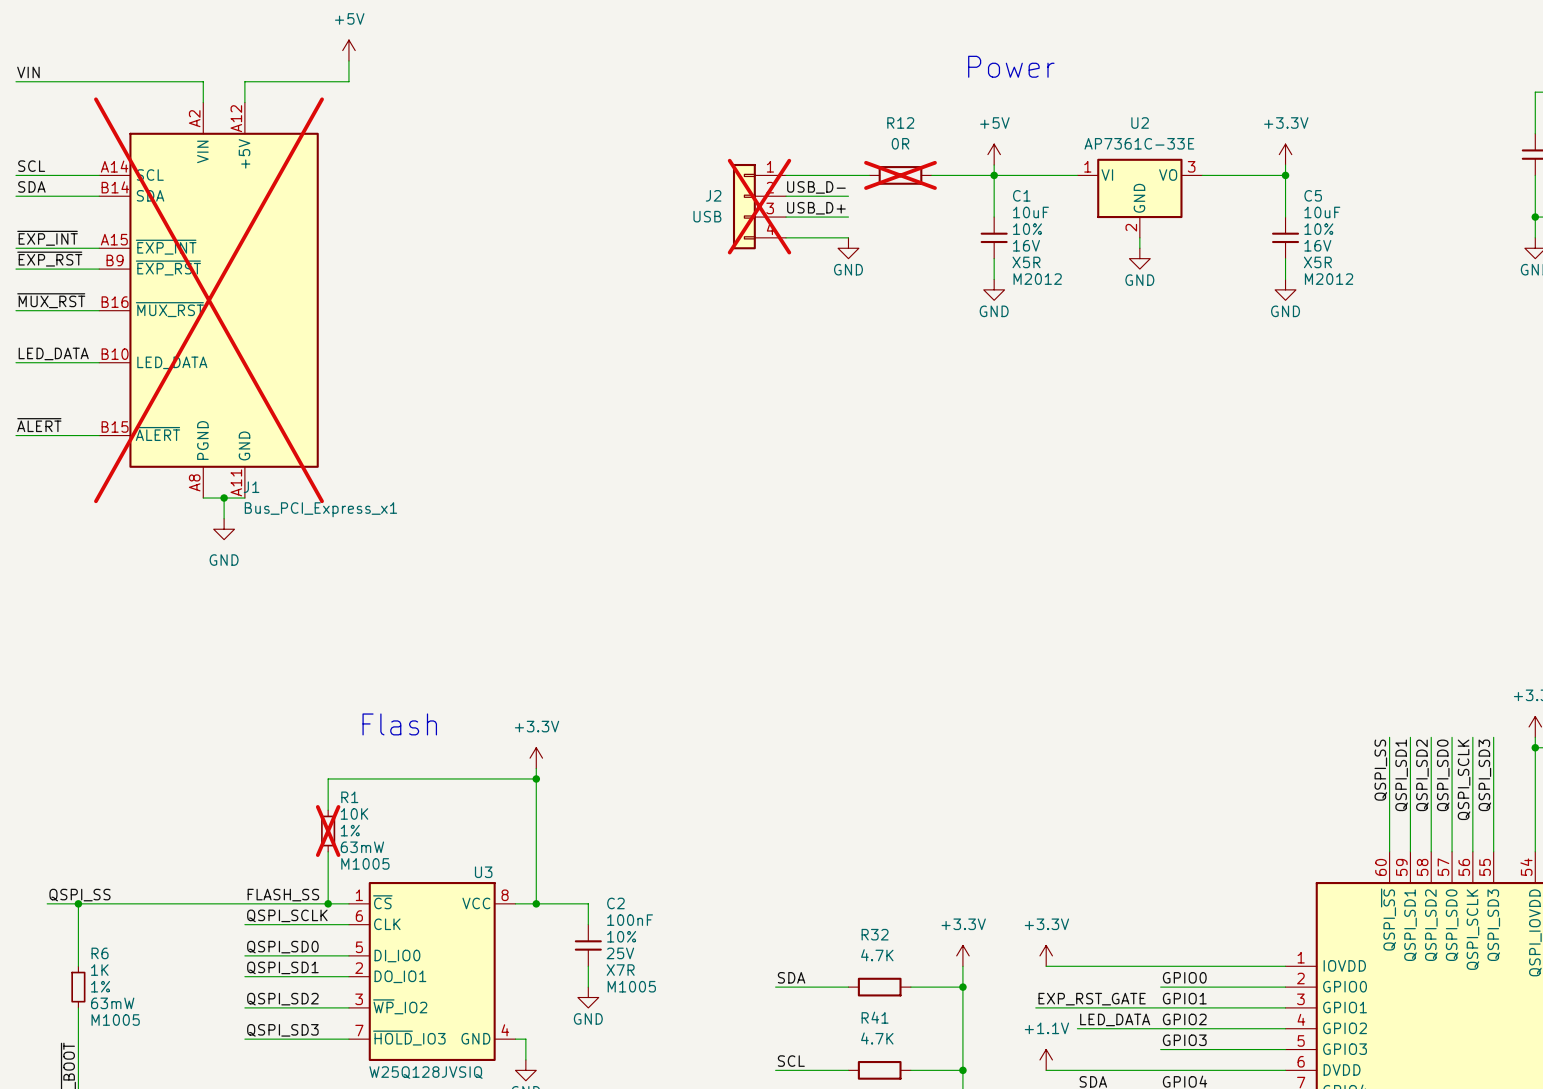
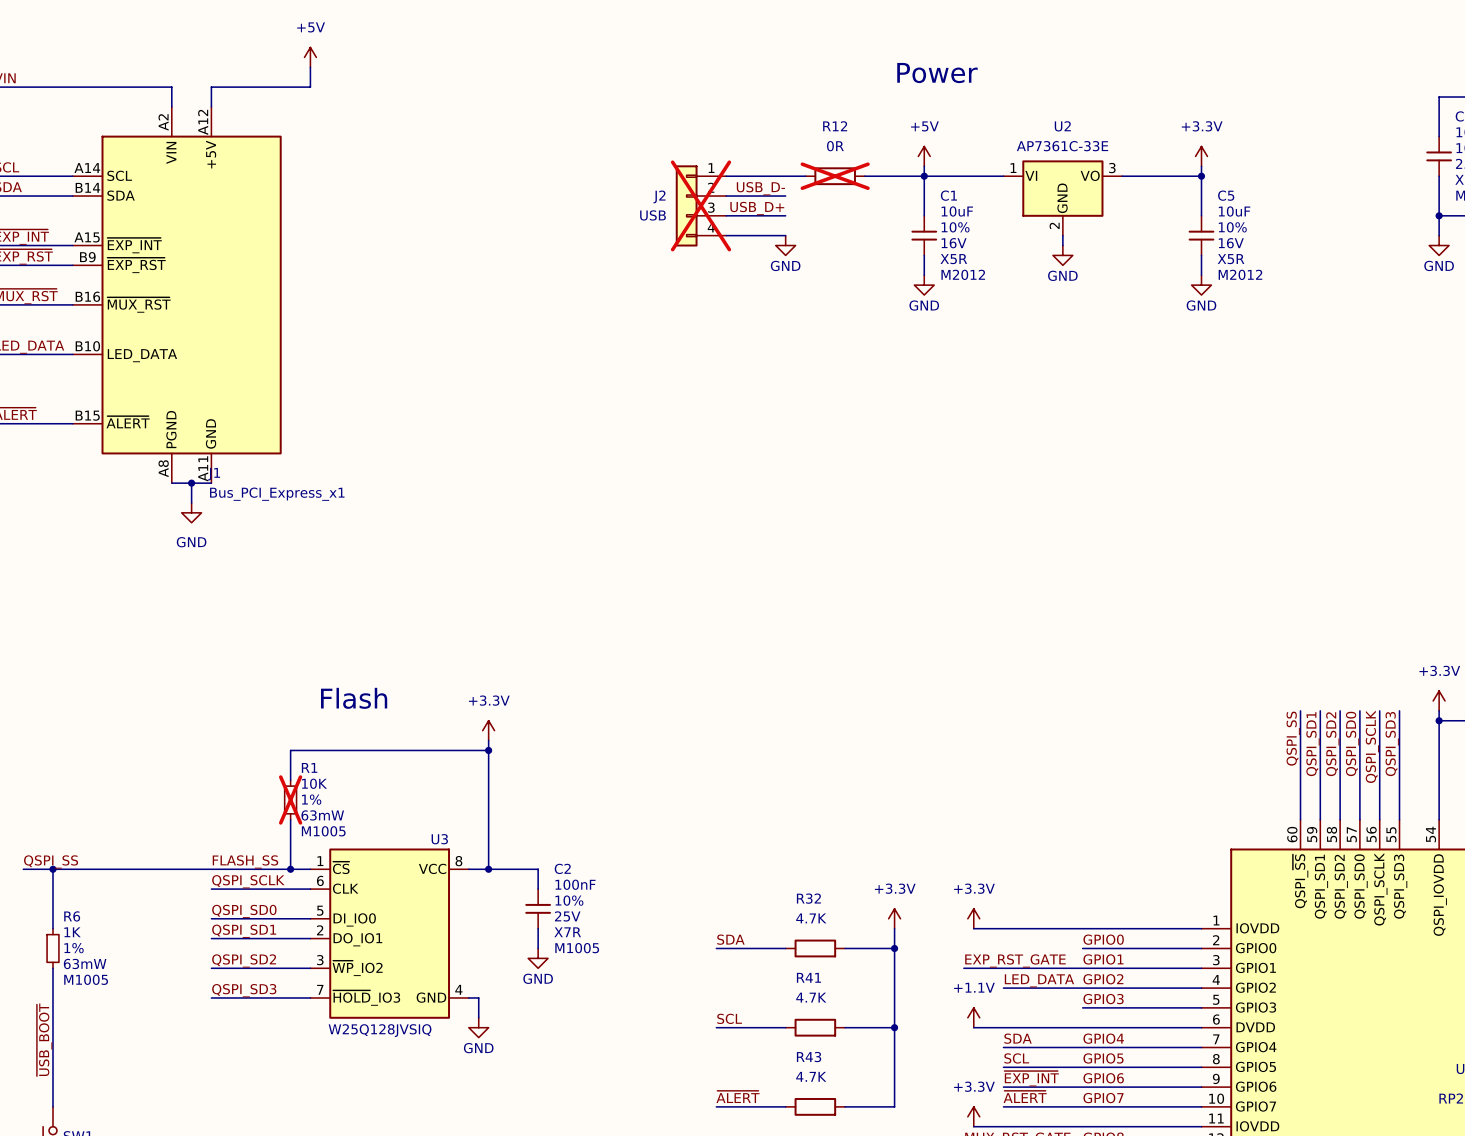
J1 do-not-place cross: (209, 300) -> none

